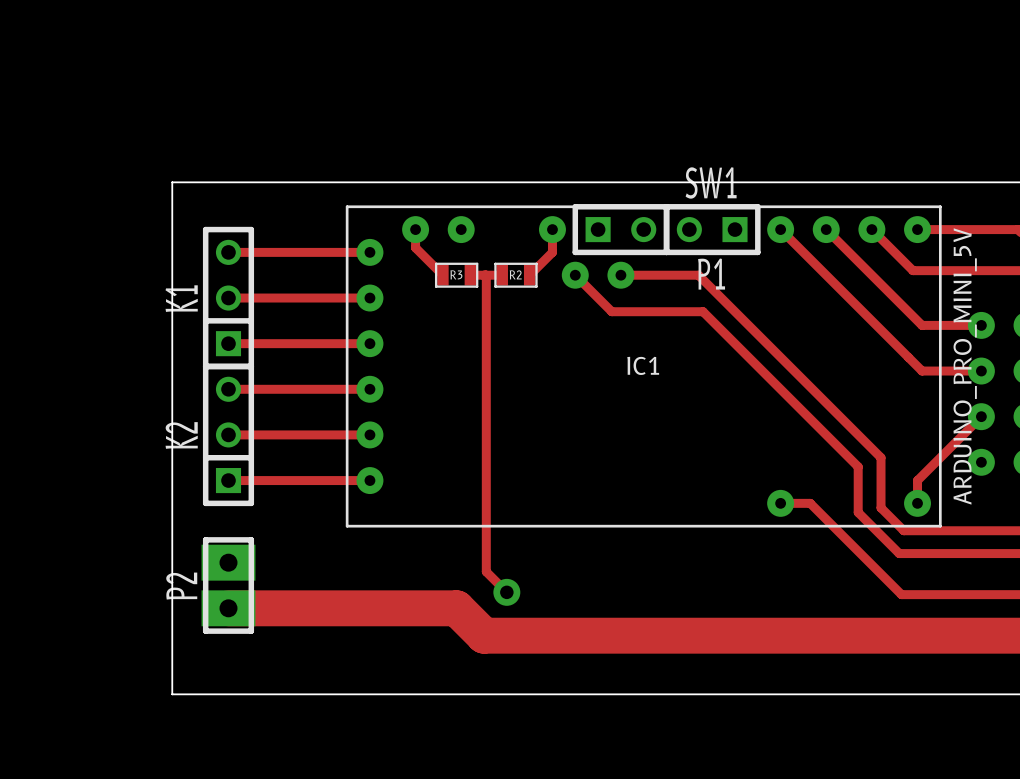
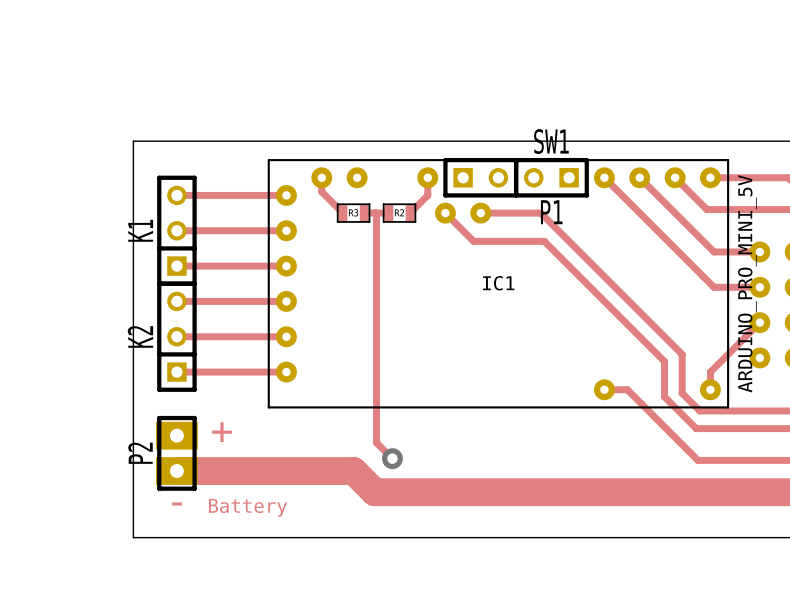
text: none -> + (222, 432)
text: none -> - (176, 503)
text: none -> Battery (247, 507)

